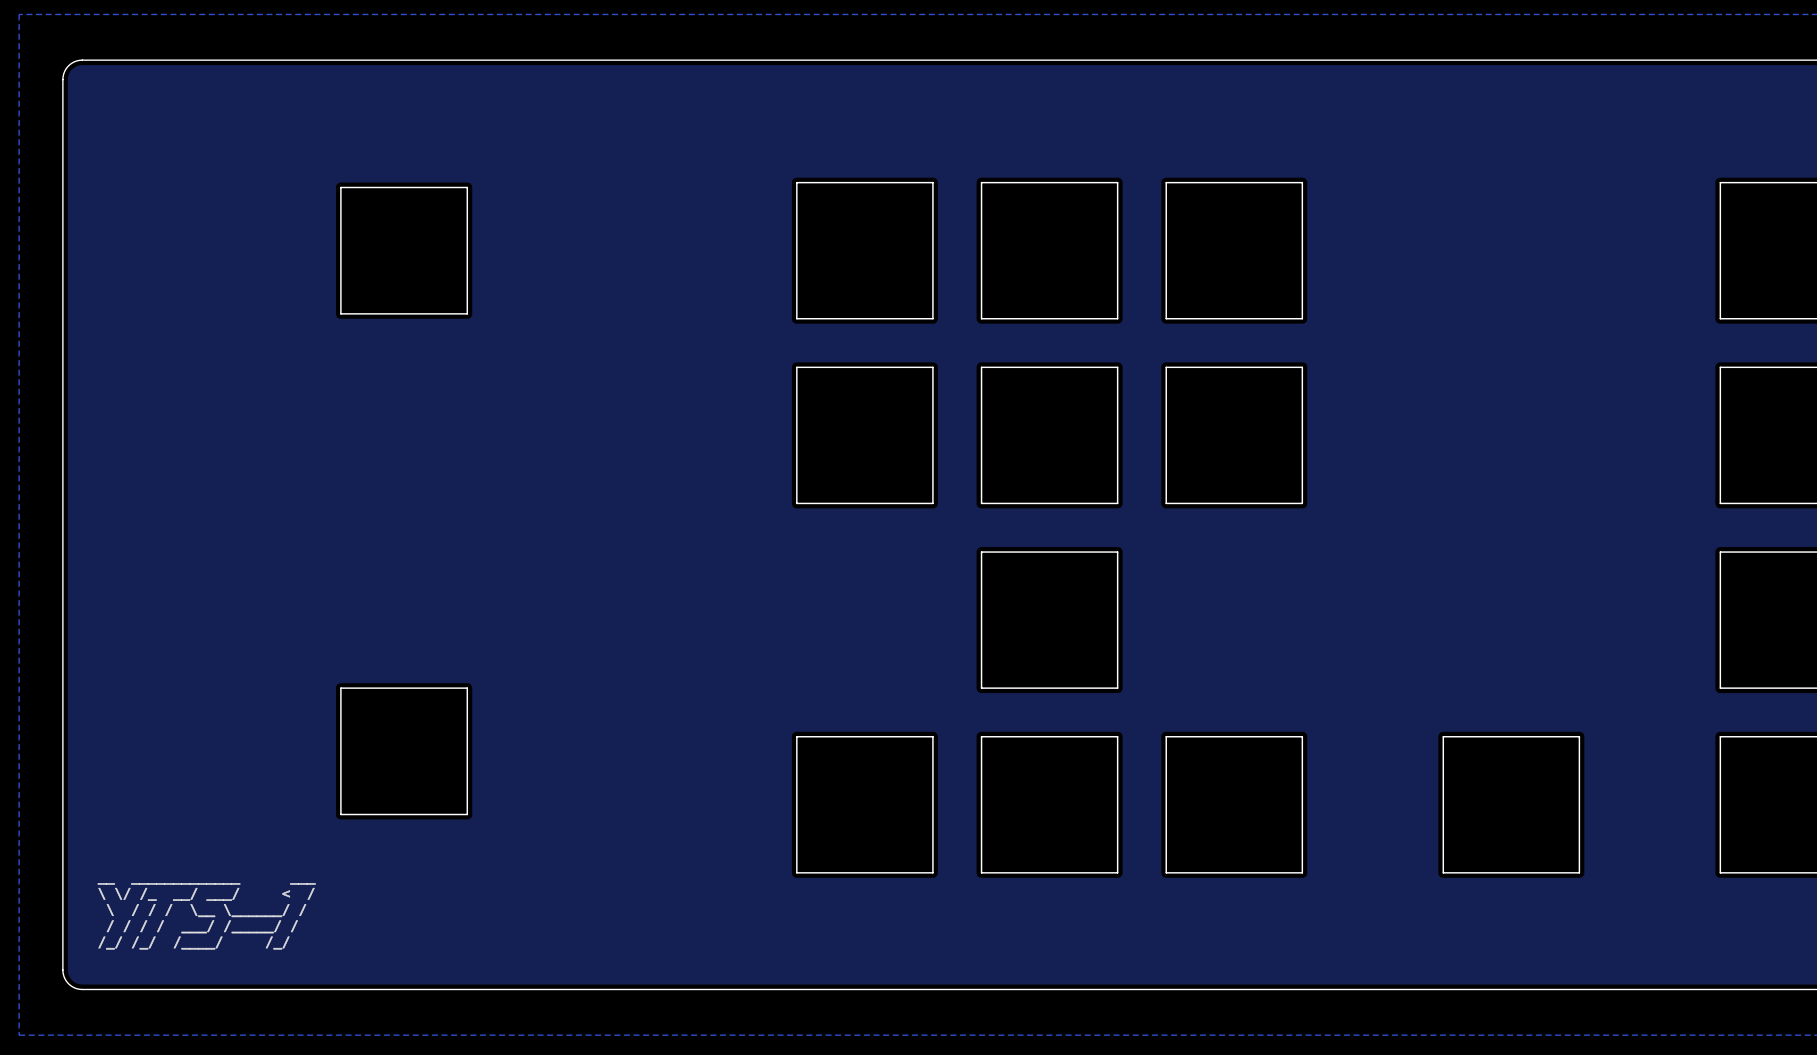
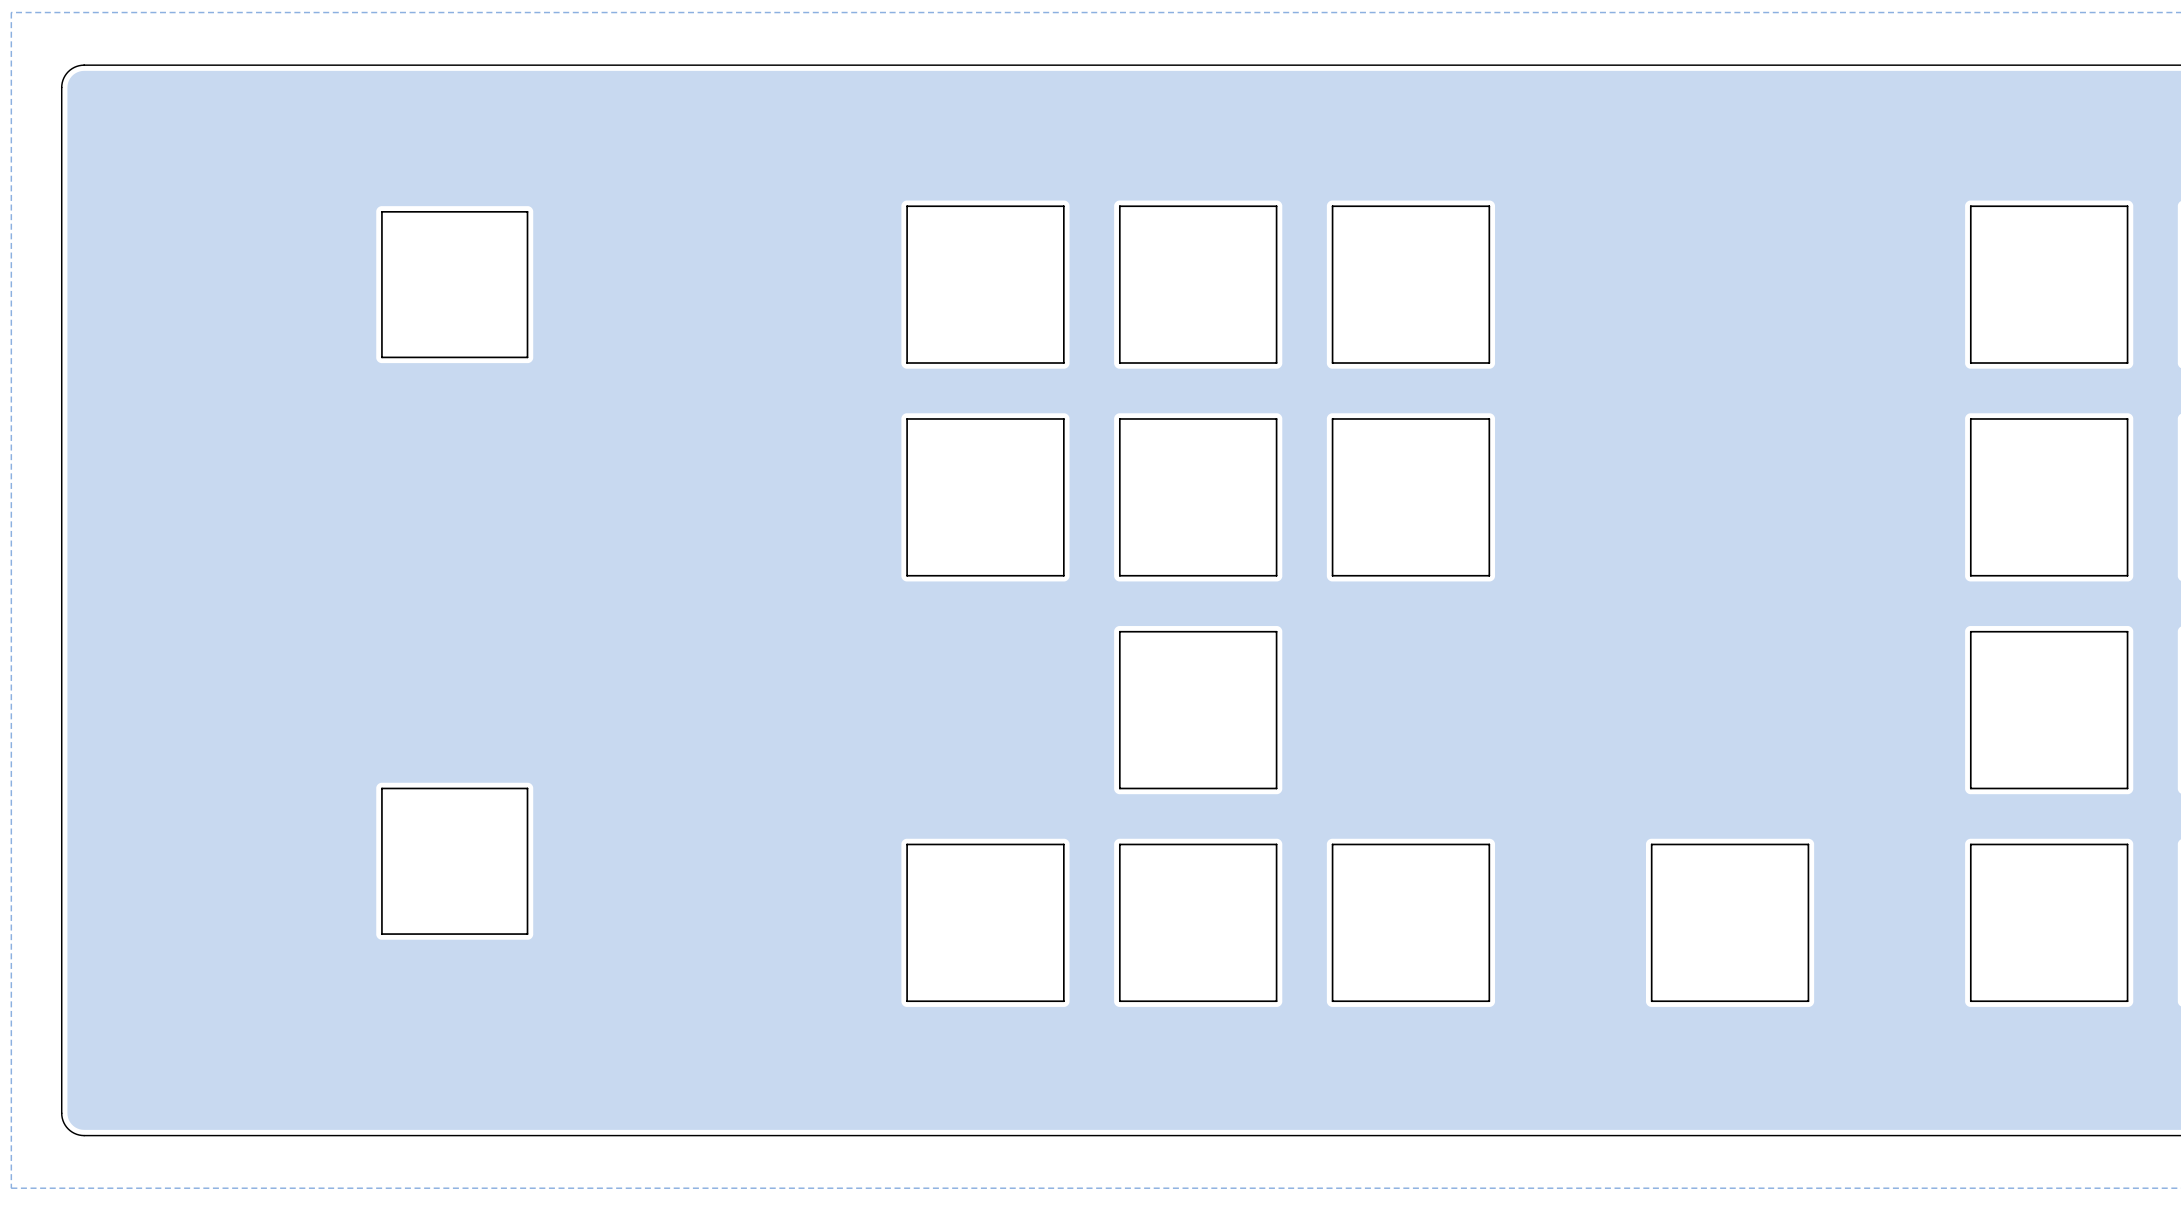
drawing: [97, 883, 316, 950] -> none

